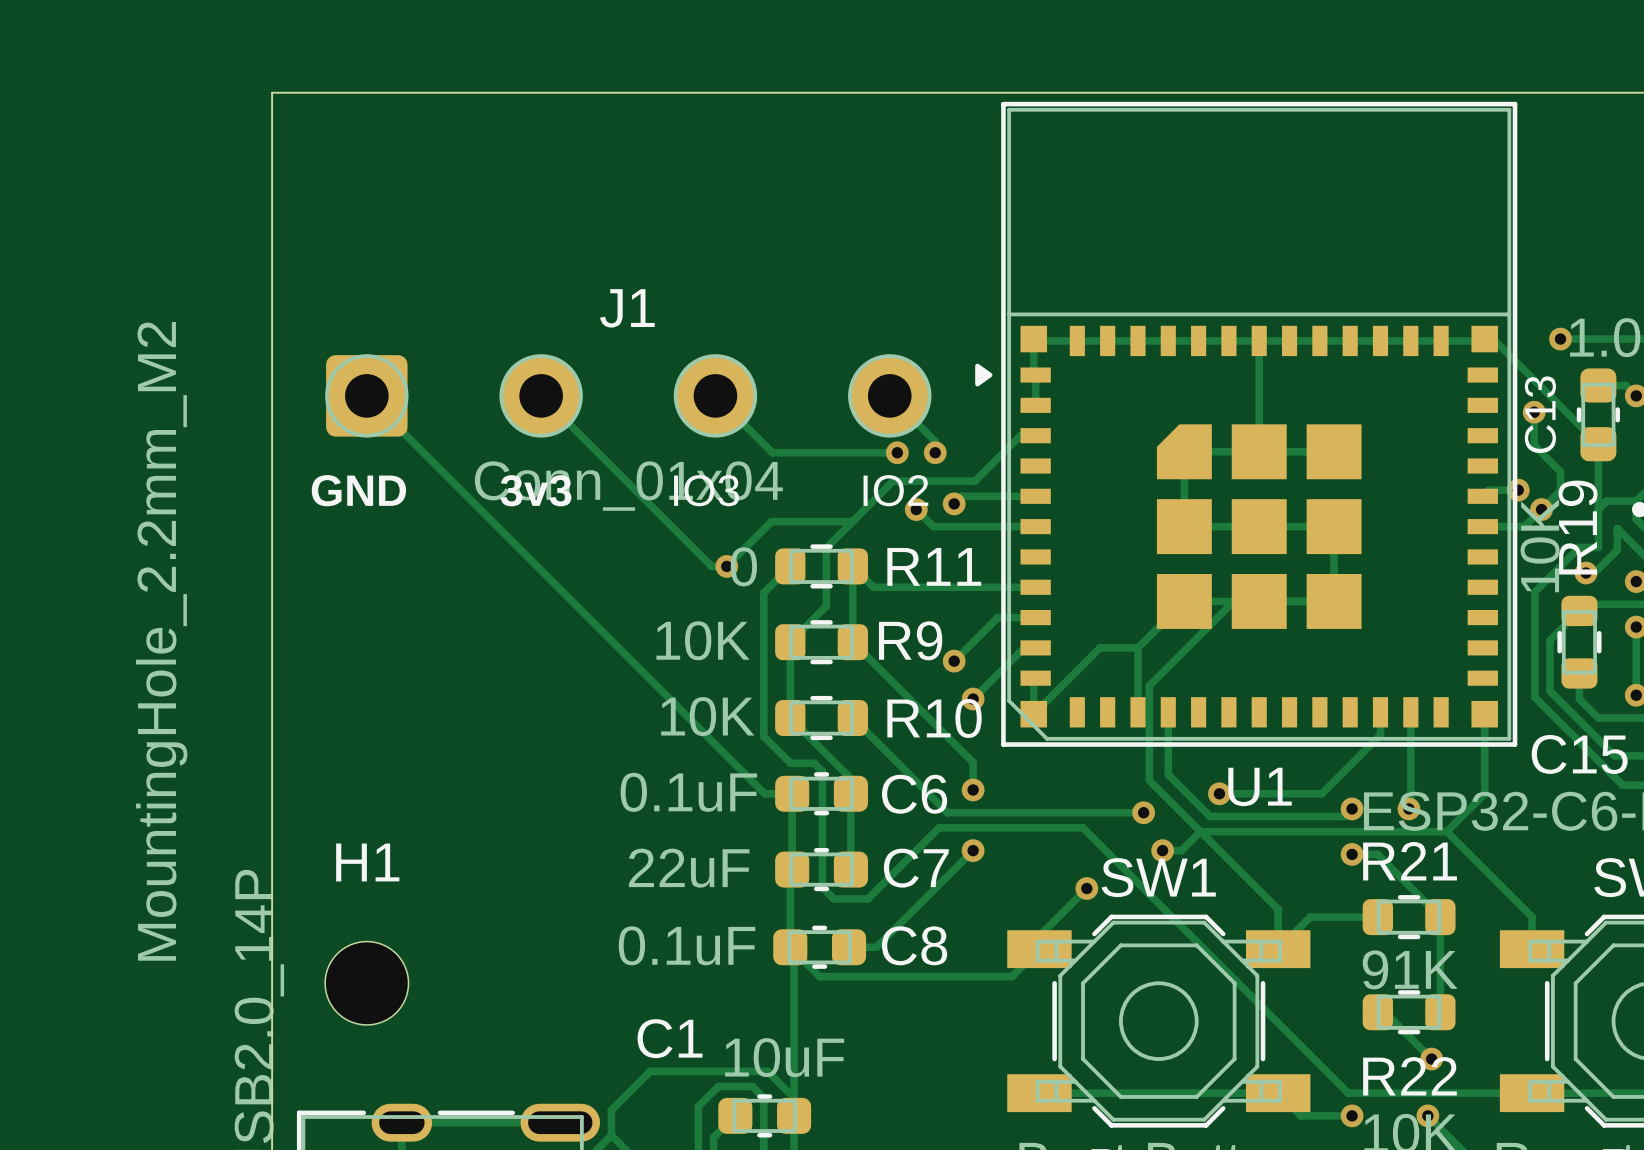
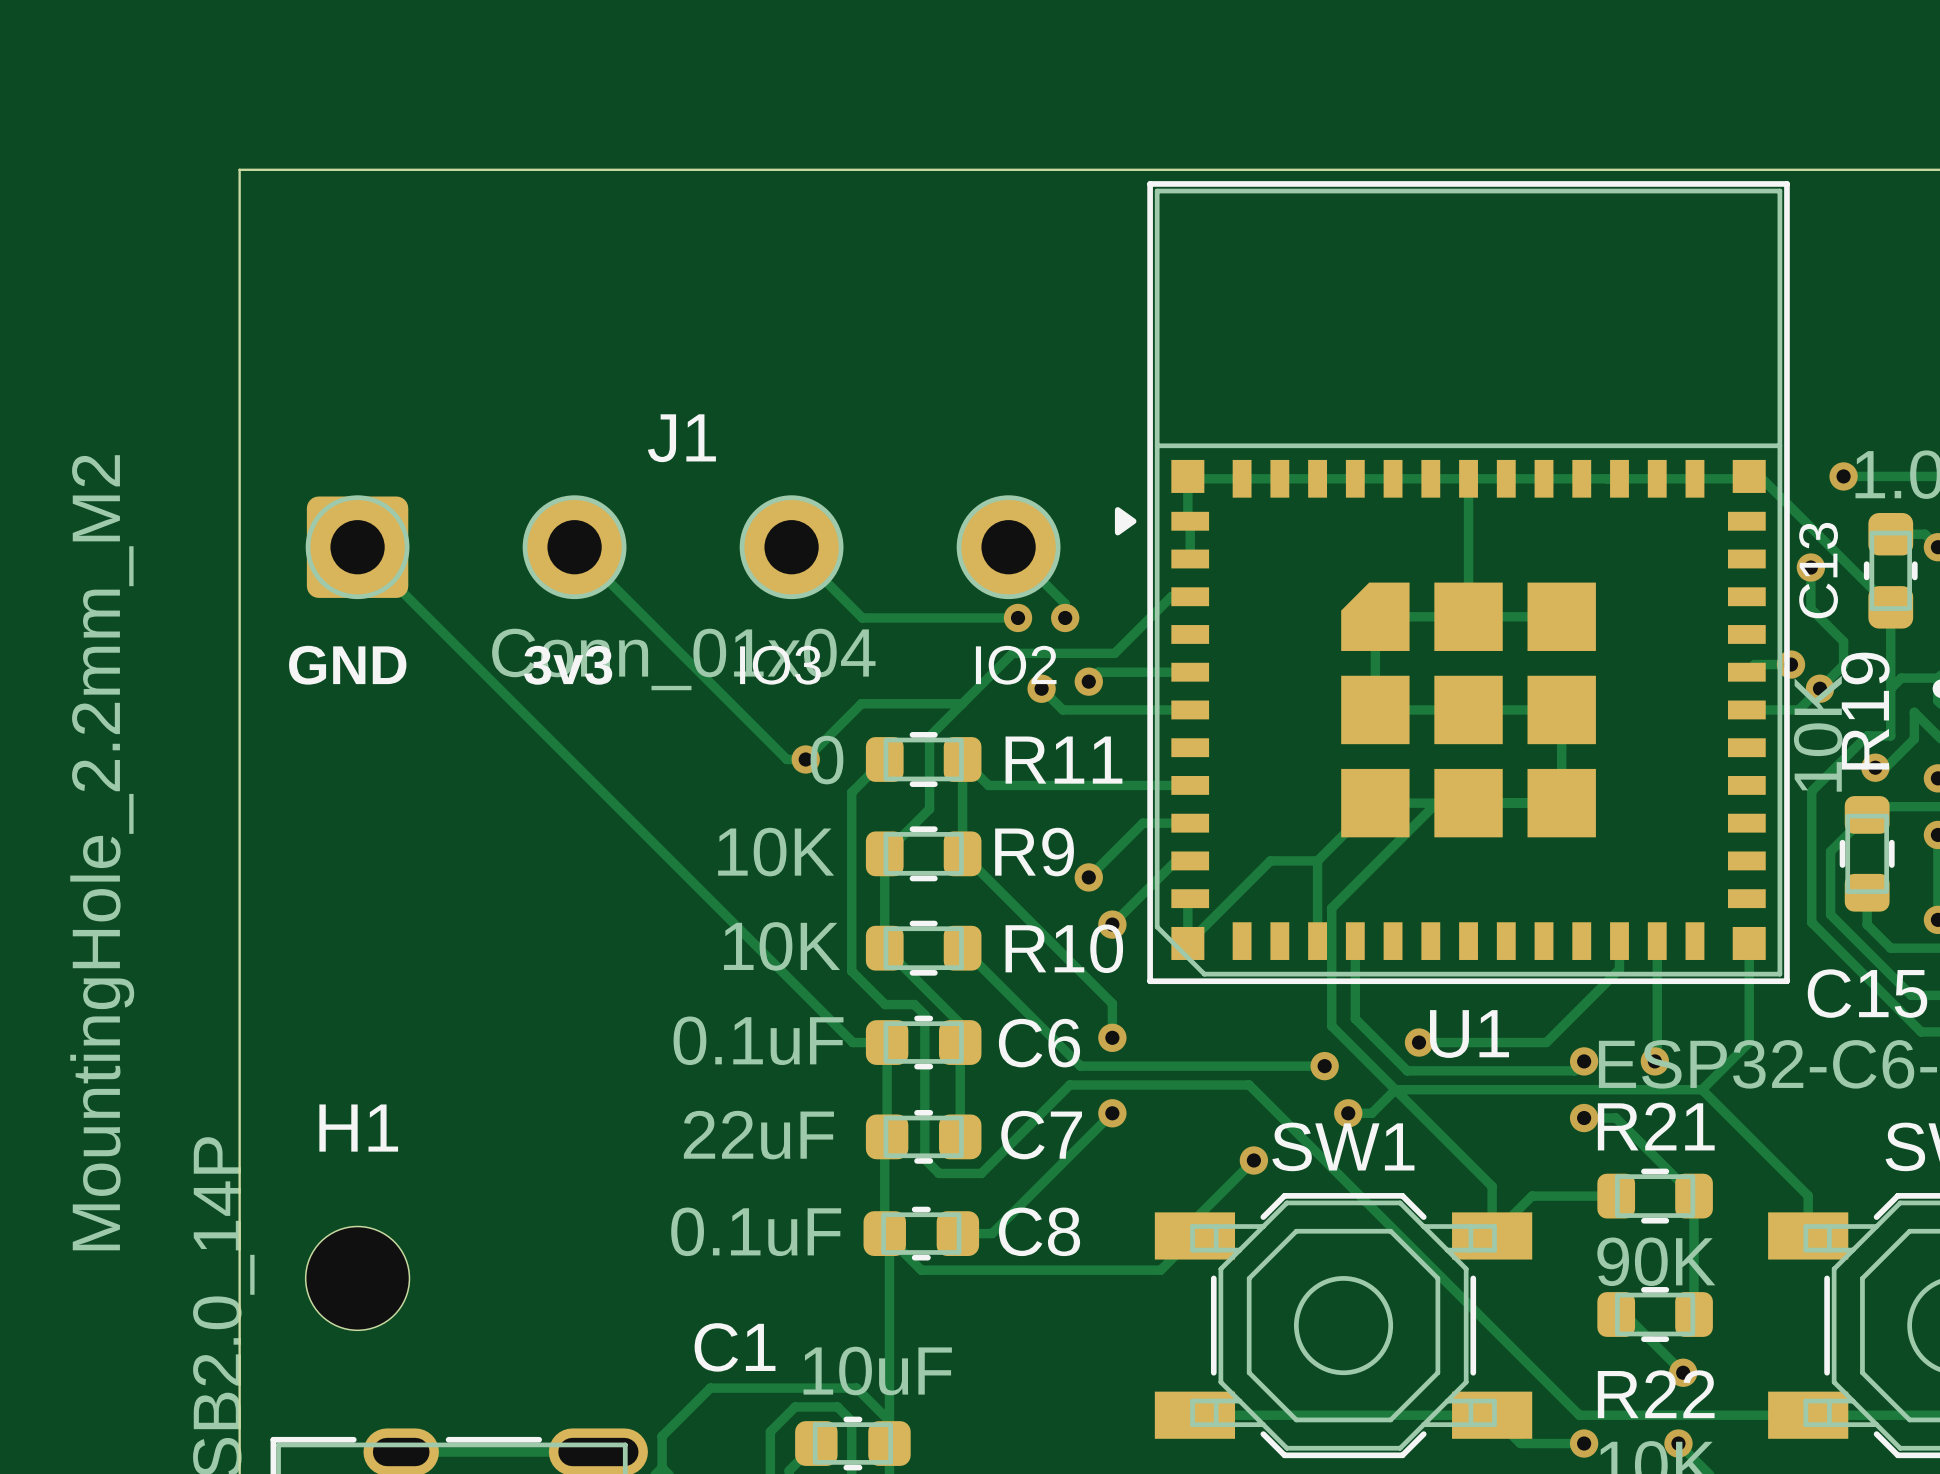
R21 value: 91K (1410, 969) -> 90K (1656, 1261)

